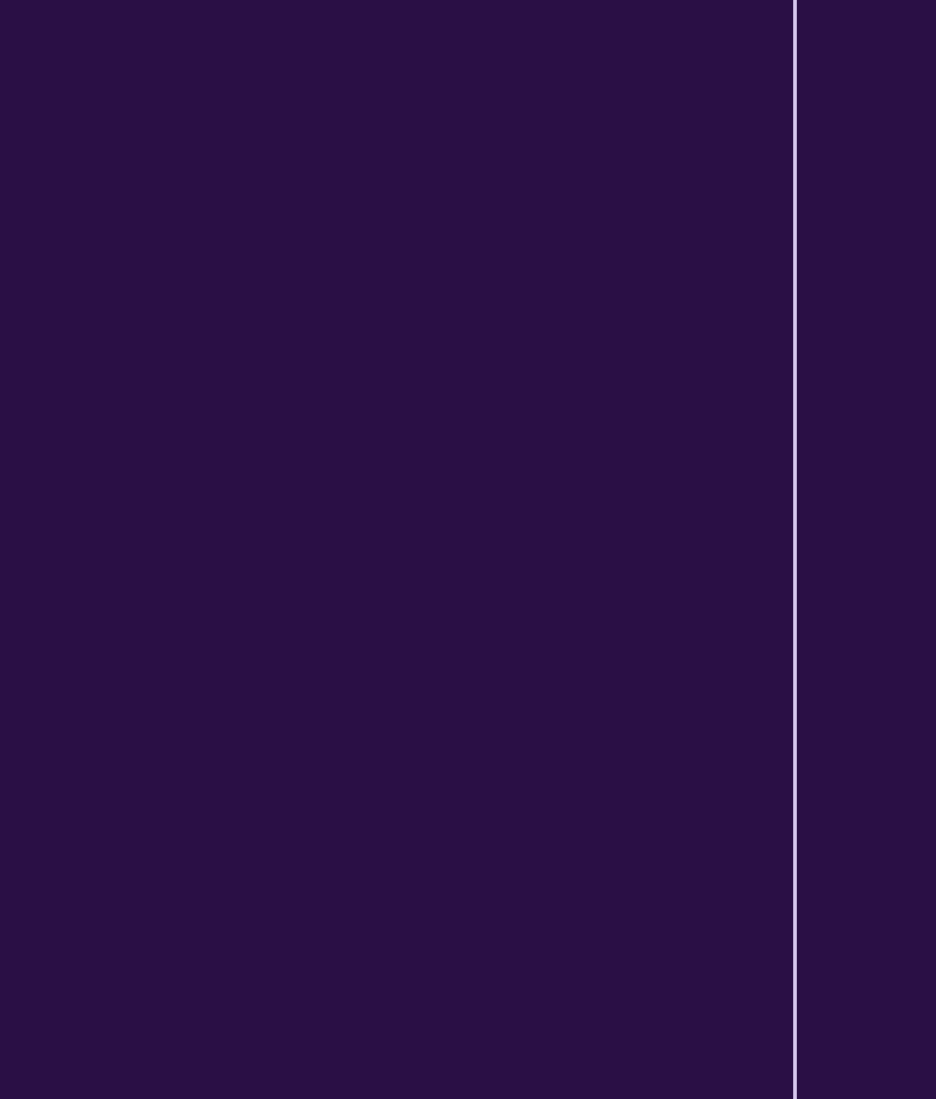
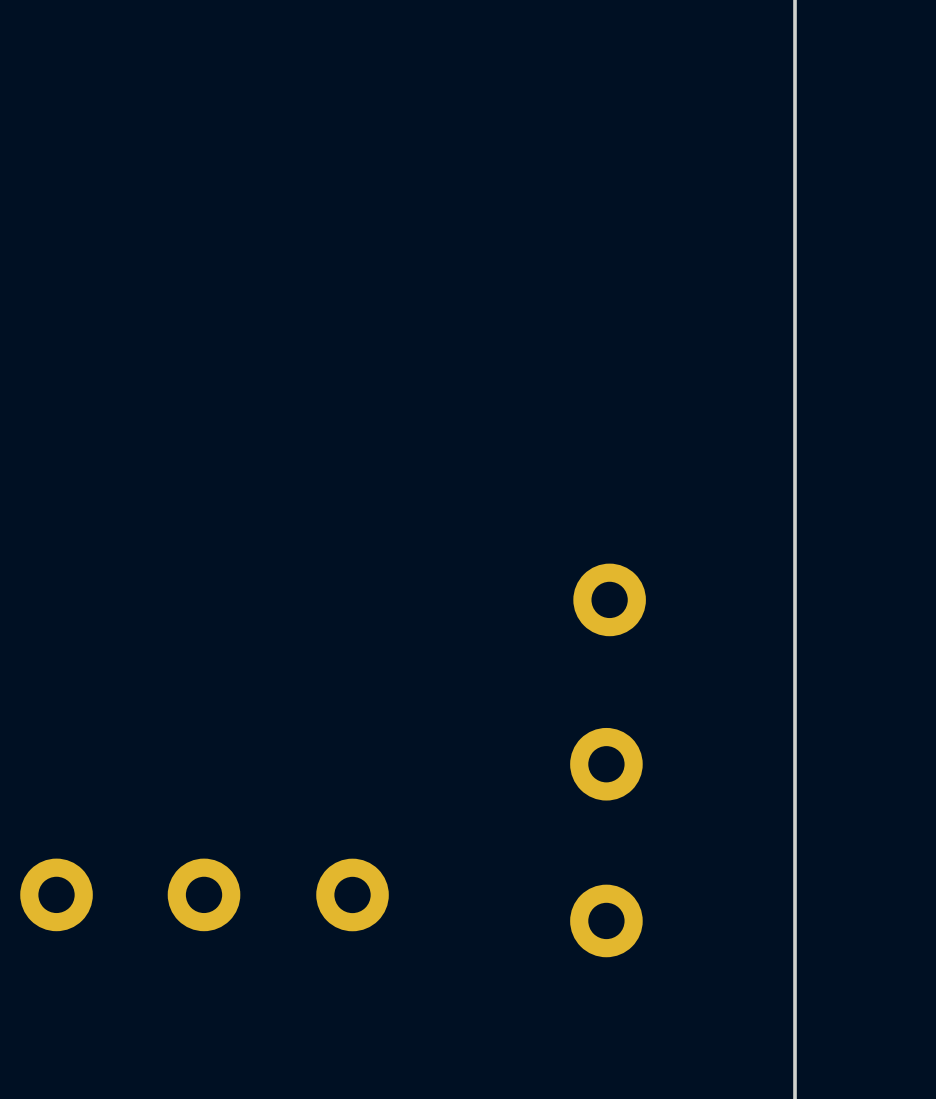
part: none -> (609, 599)
part: none -> (606, 764)
part: none -> (56, 894)
part: none -> (204, 894)
part: none -> (352, 894)
part: none -> (606, 920)

